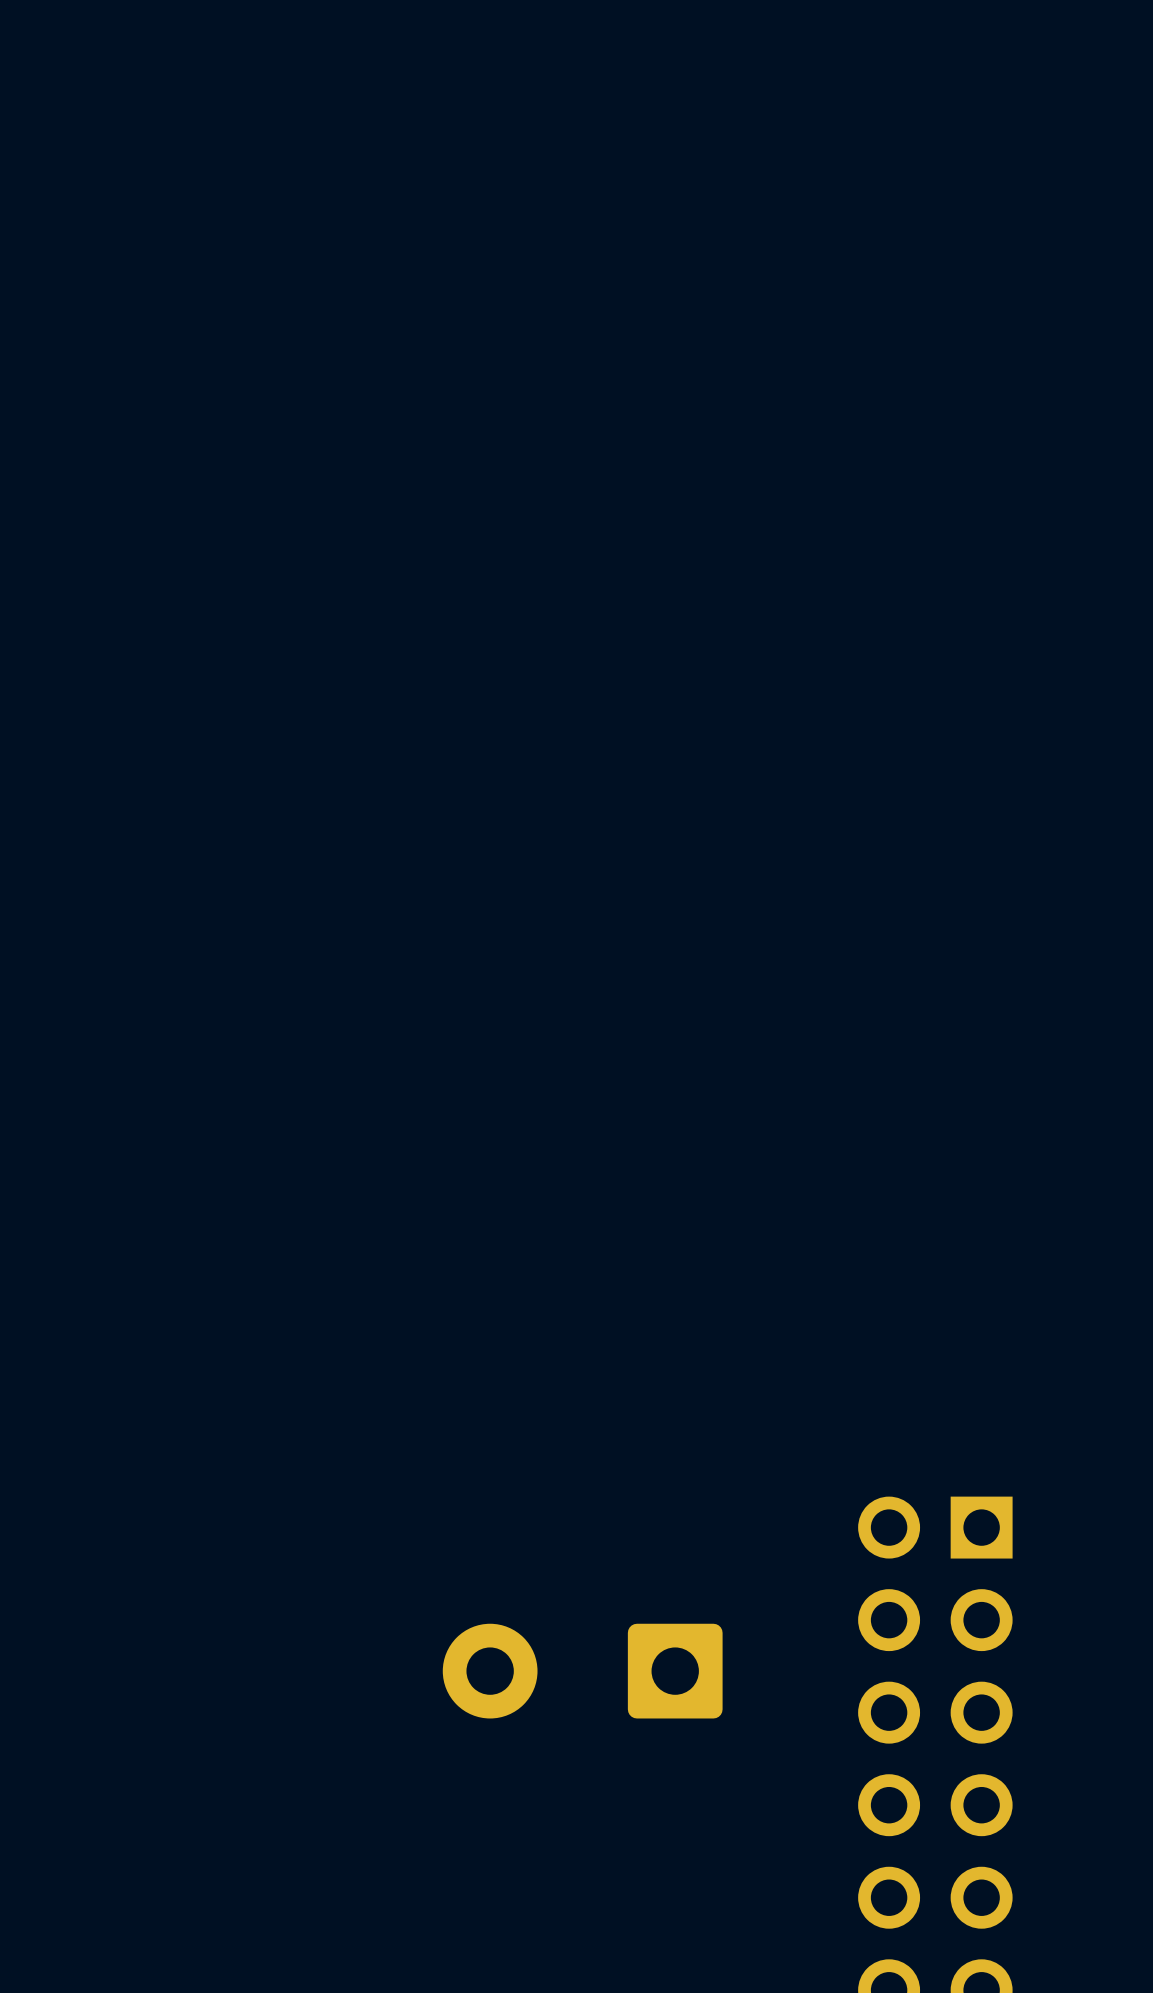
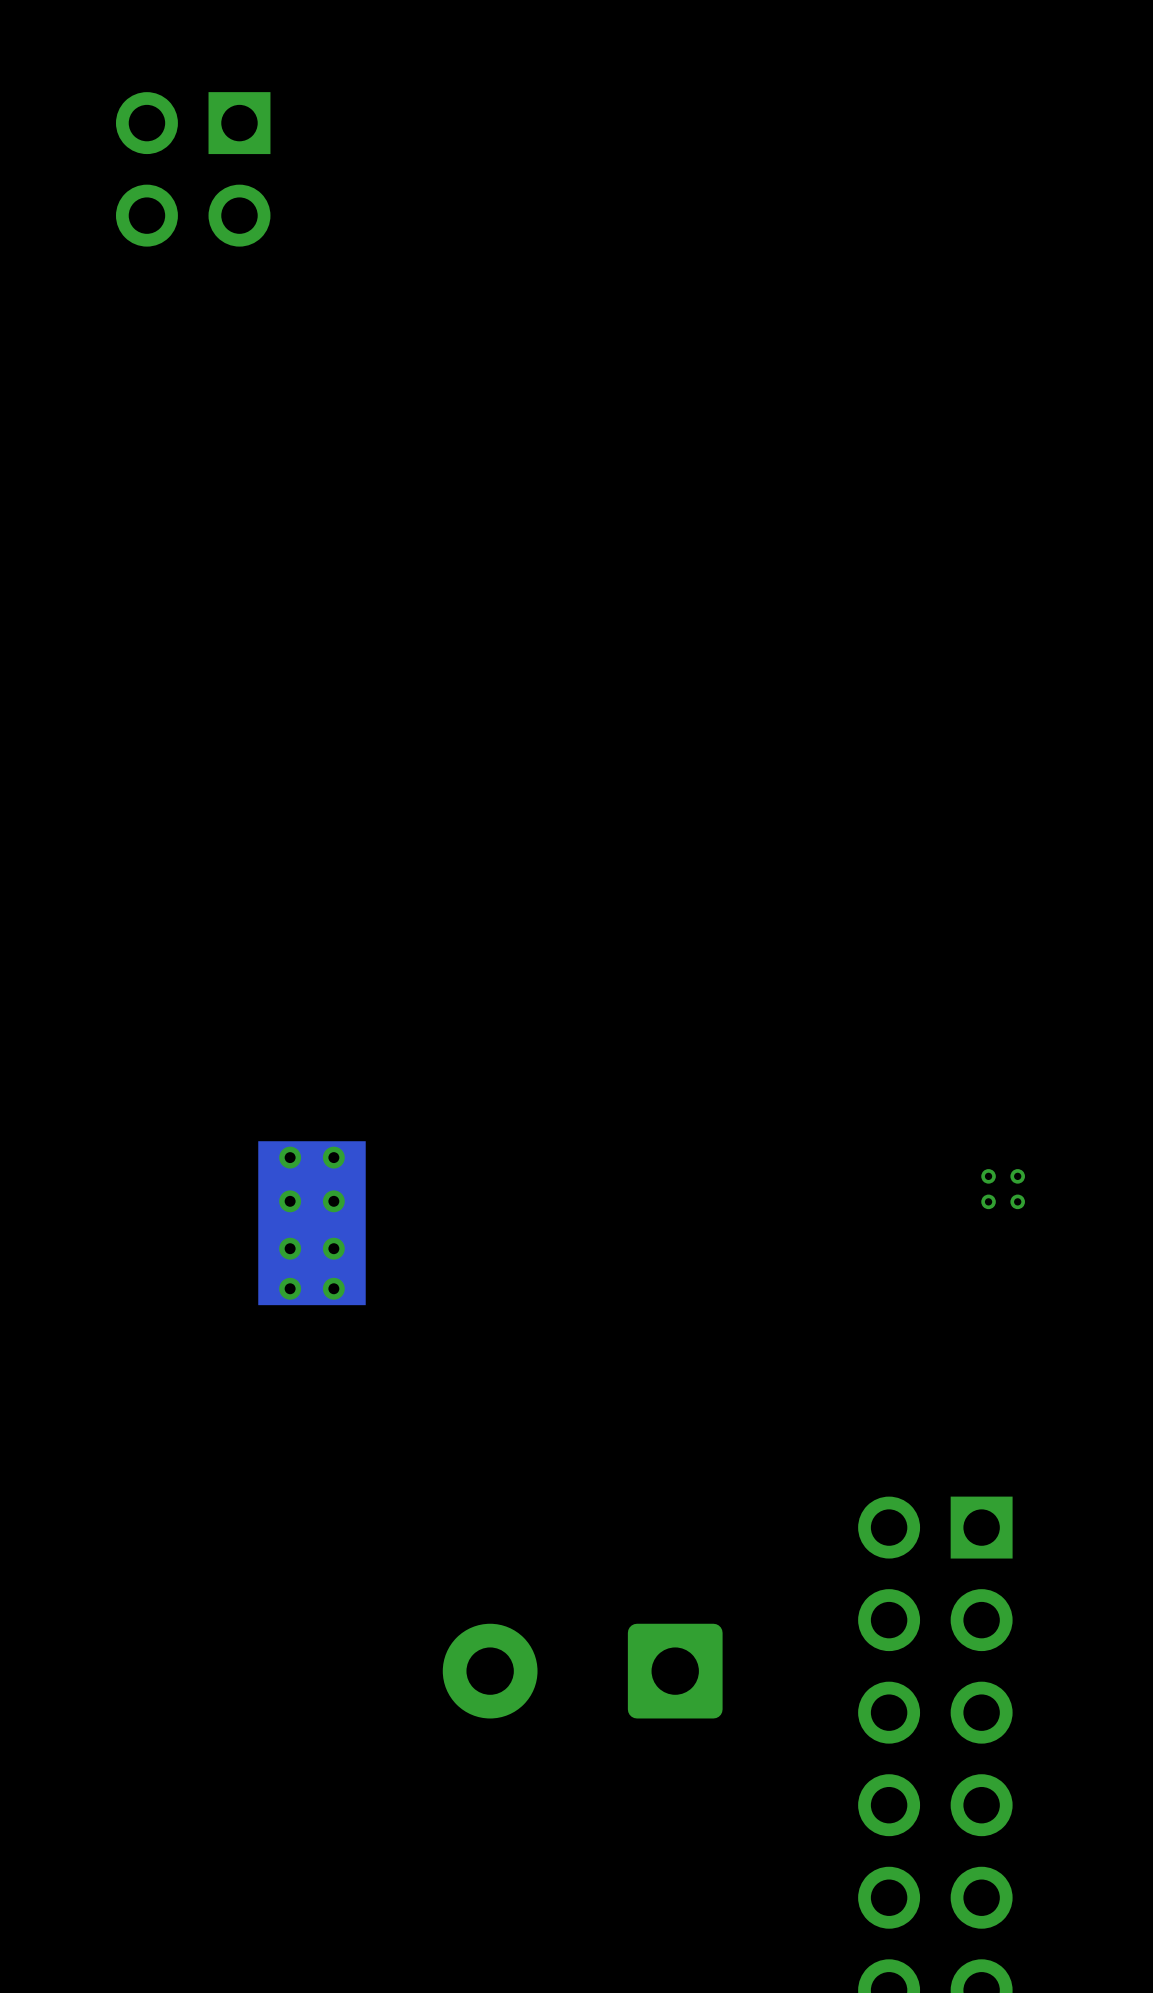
part: none -> (193, 169)
part: none -> (1003, 1189)
part: none -> (311, 1223)

